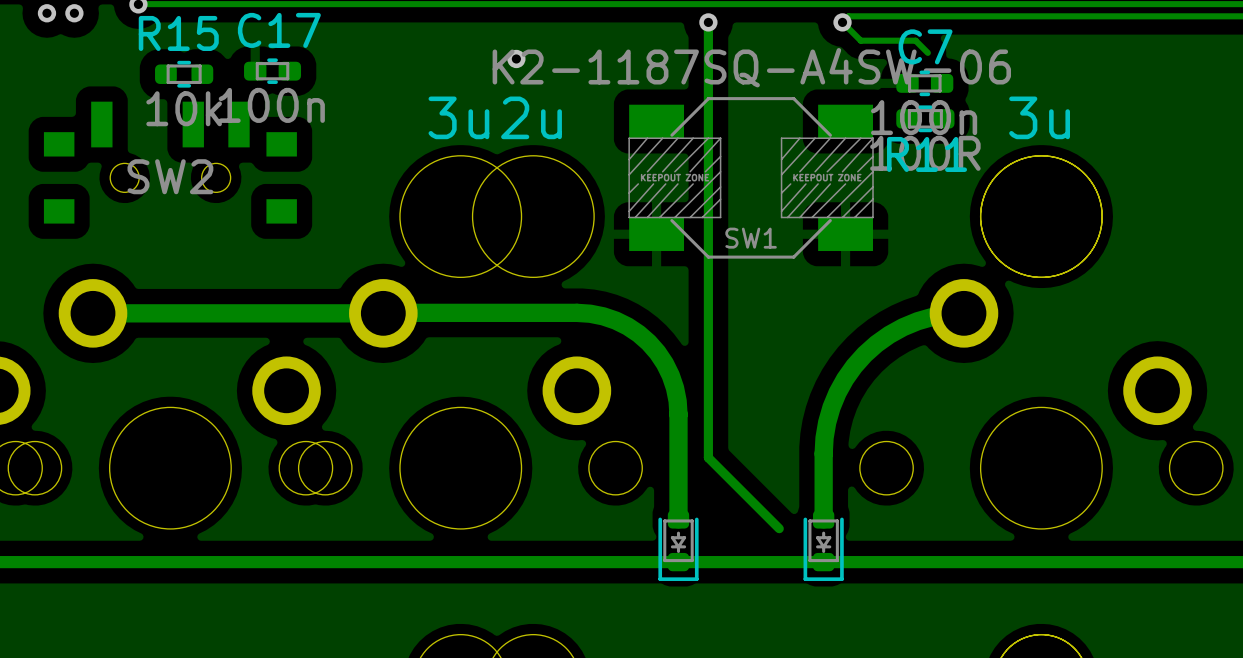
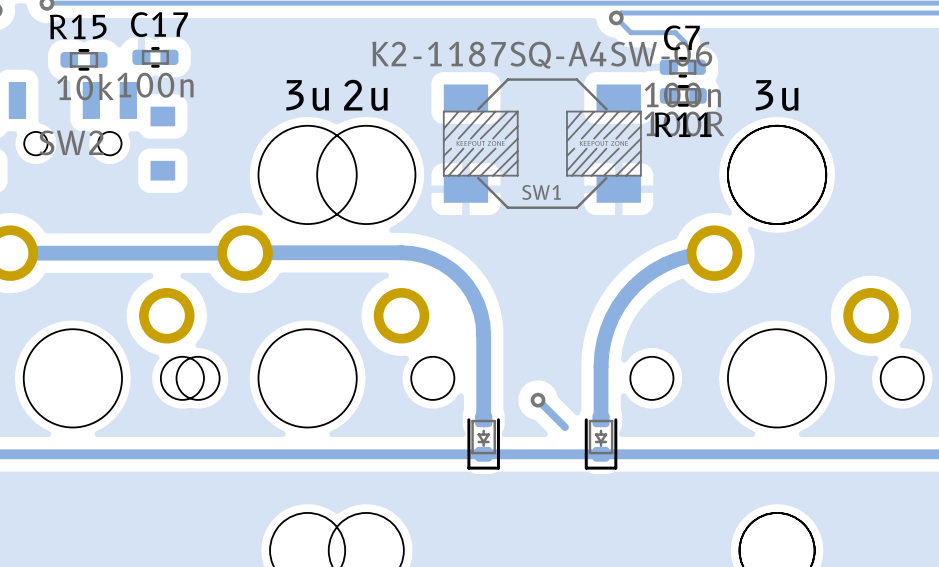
track: (708, 22) (708, 457) (745, 495) -> none
via: (708, 22) -> none
via: (516, 58) -> none
via: none -> (538, 400)

